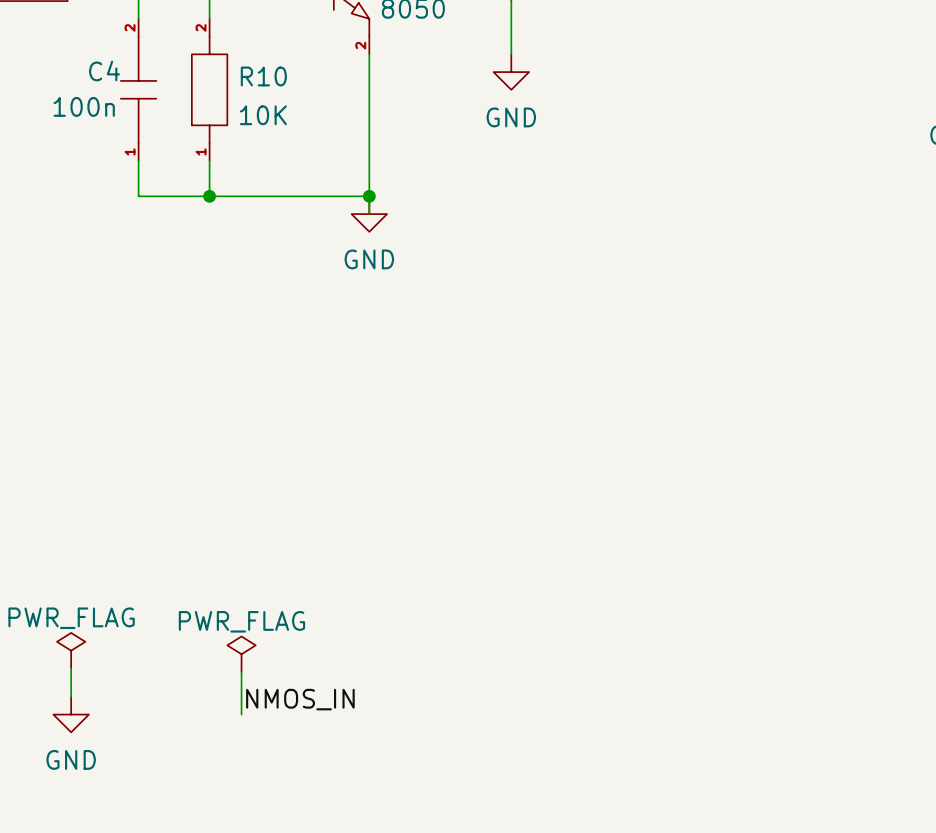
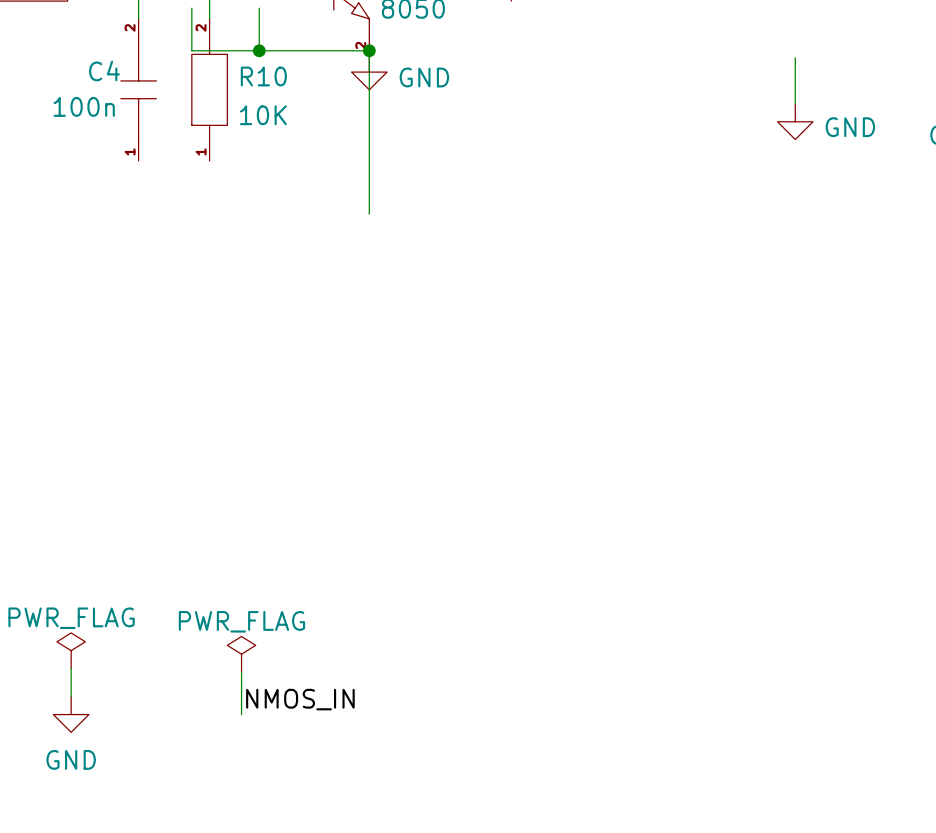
wire: (511, 1) (511, 54) -> none
wire: none -> (191, 8) (191, 50) (369, 50)
wire: none -> (259, 8) (259, 50)
junction: none -> (259, 50)
junction: none -> (369, 50)
wire: none -> (795, 57) (795, 104)
power symbol: none -> GND (369, 72)
power symbol: GND (511, 72) -> none
power symbol: none -> GND (795, 121)
wire: (138, 160) (138, 196) (369, 196) -> none
wire: (209, 160) (209, 196) -> none
junction: (209, 196) -> none
junction: (369, 196) -> none
power symbol: GND (369, 214) -> none

